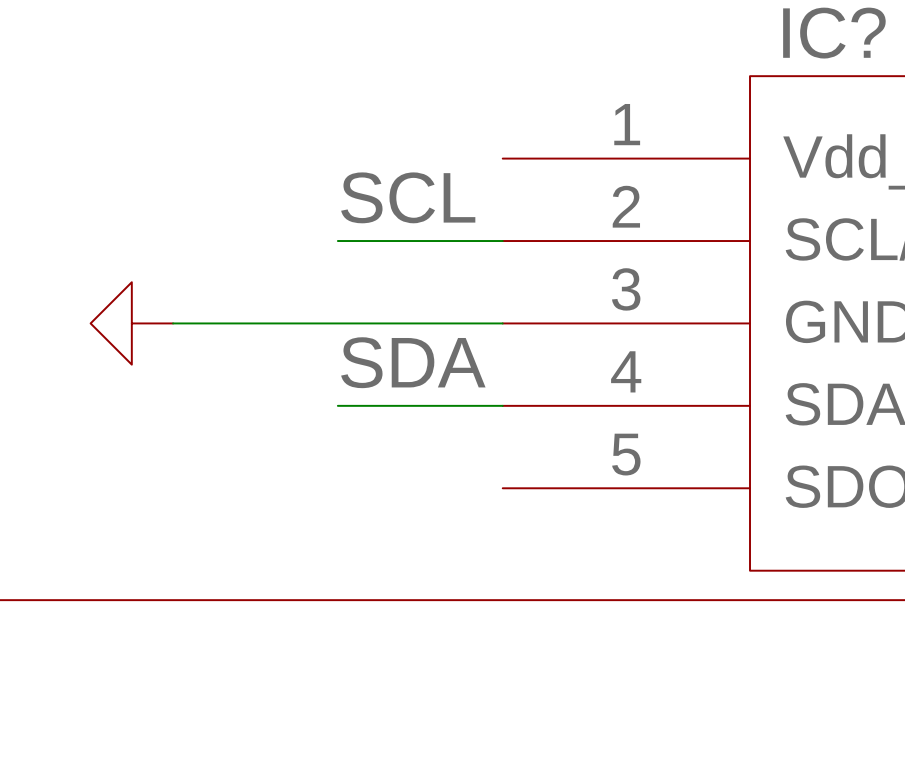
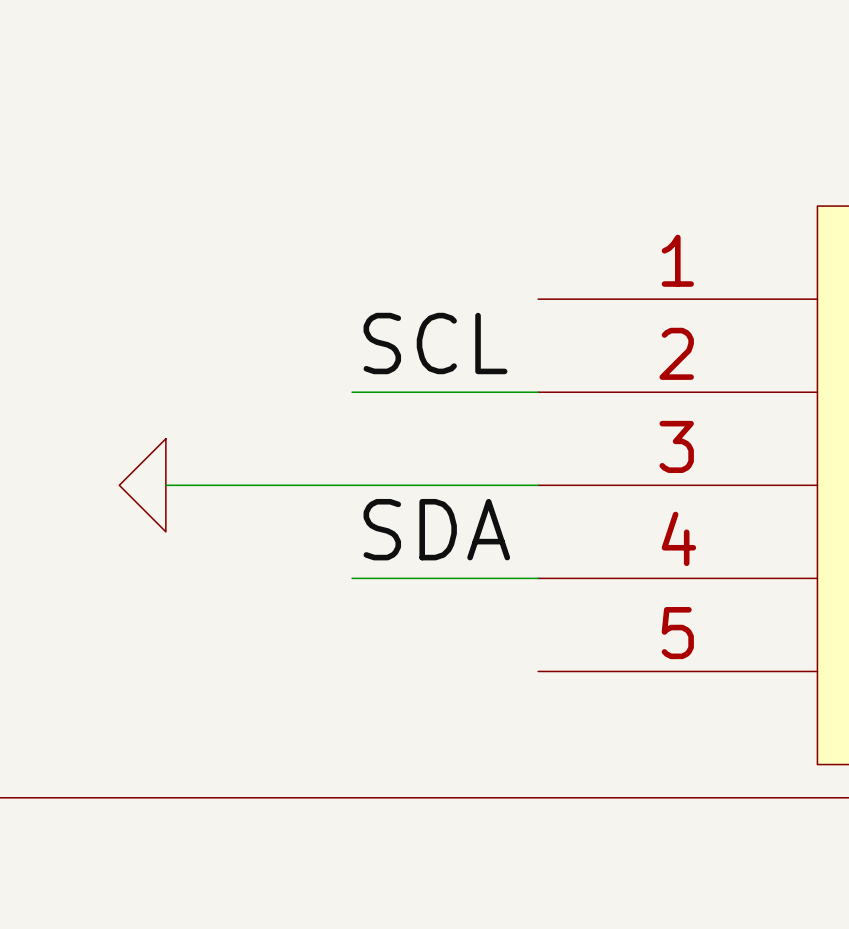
power symbol shape: [90, 282, 174, 365] -> [119, 438, 166, 532]

